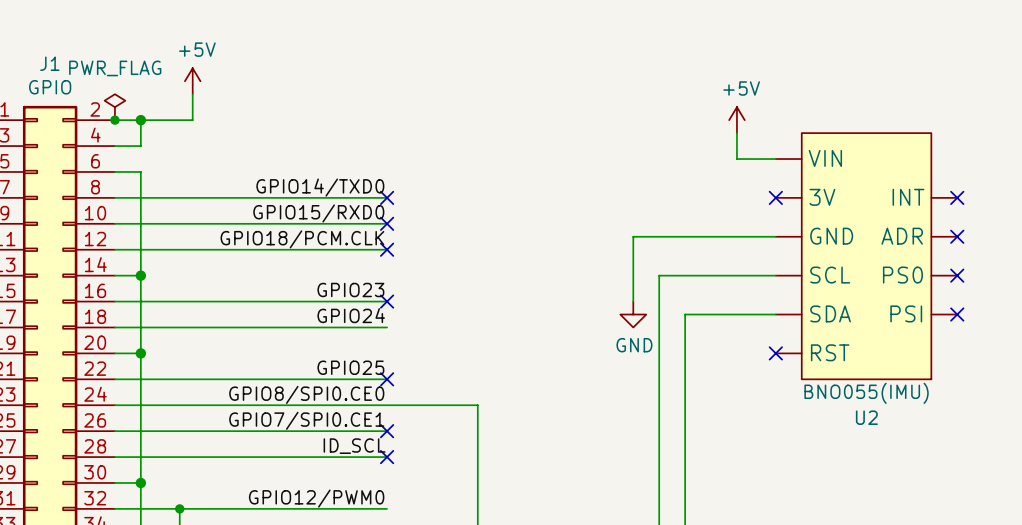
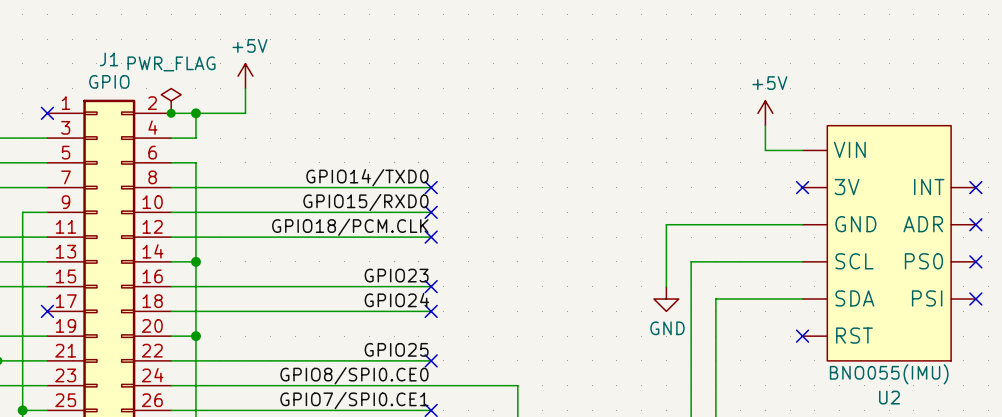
no-connect mark: none -> (431, 311)

